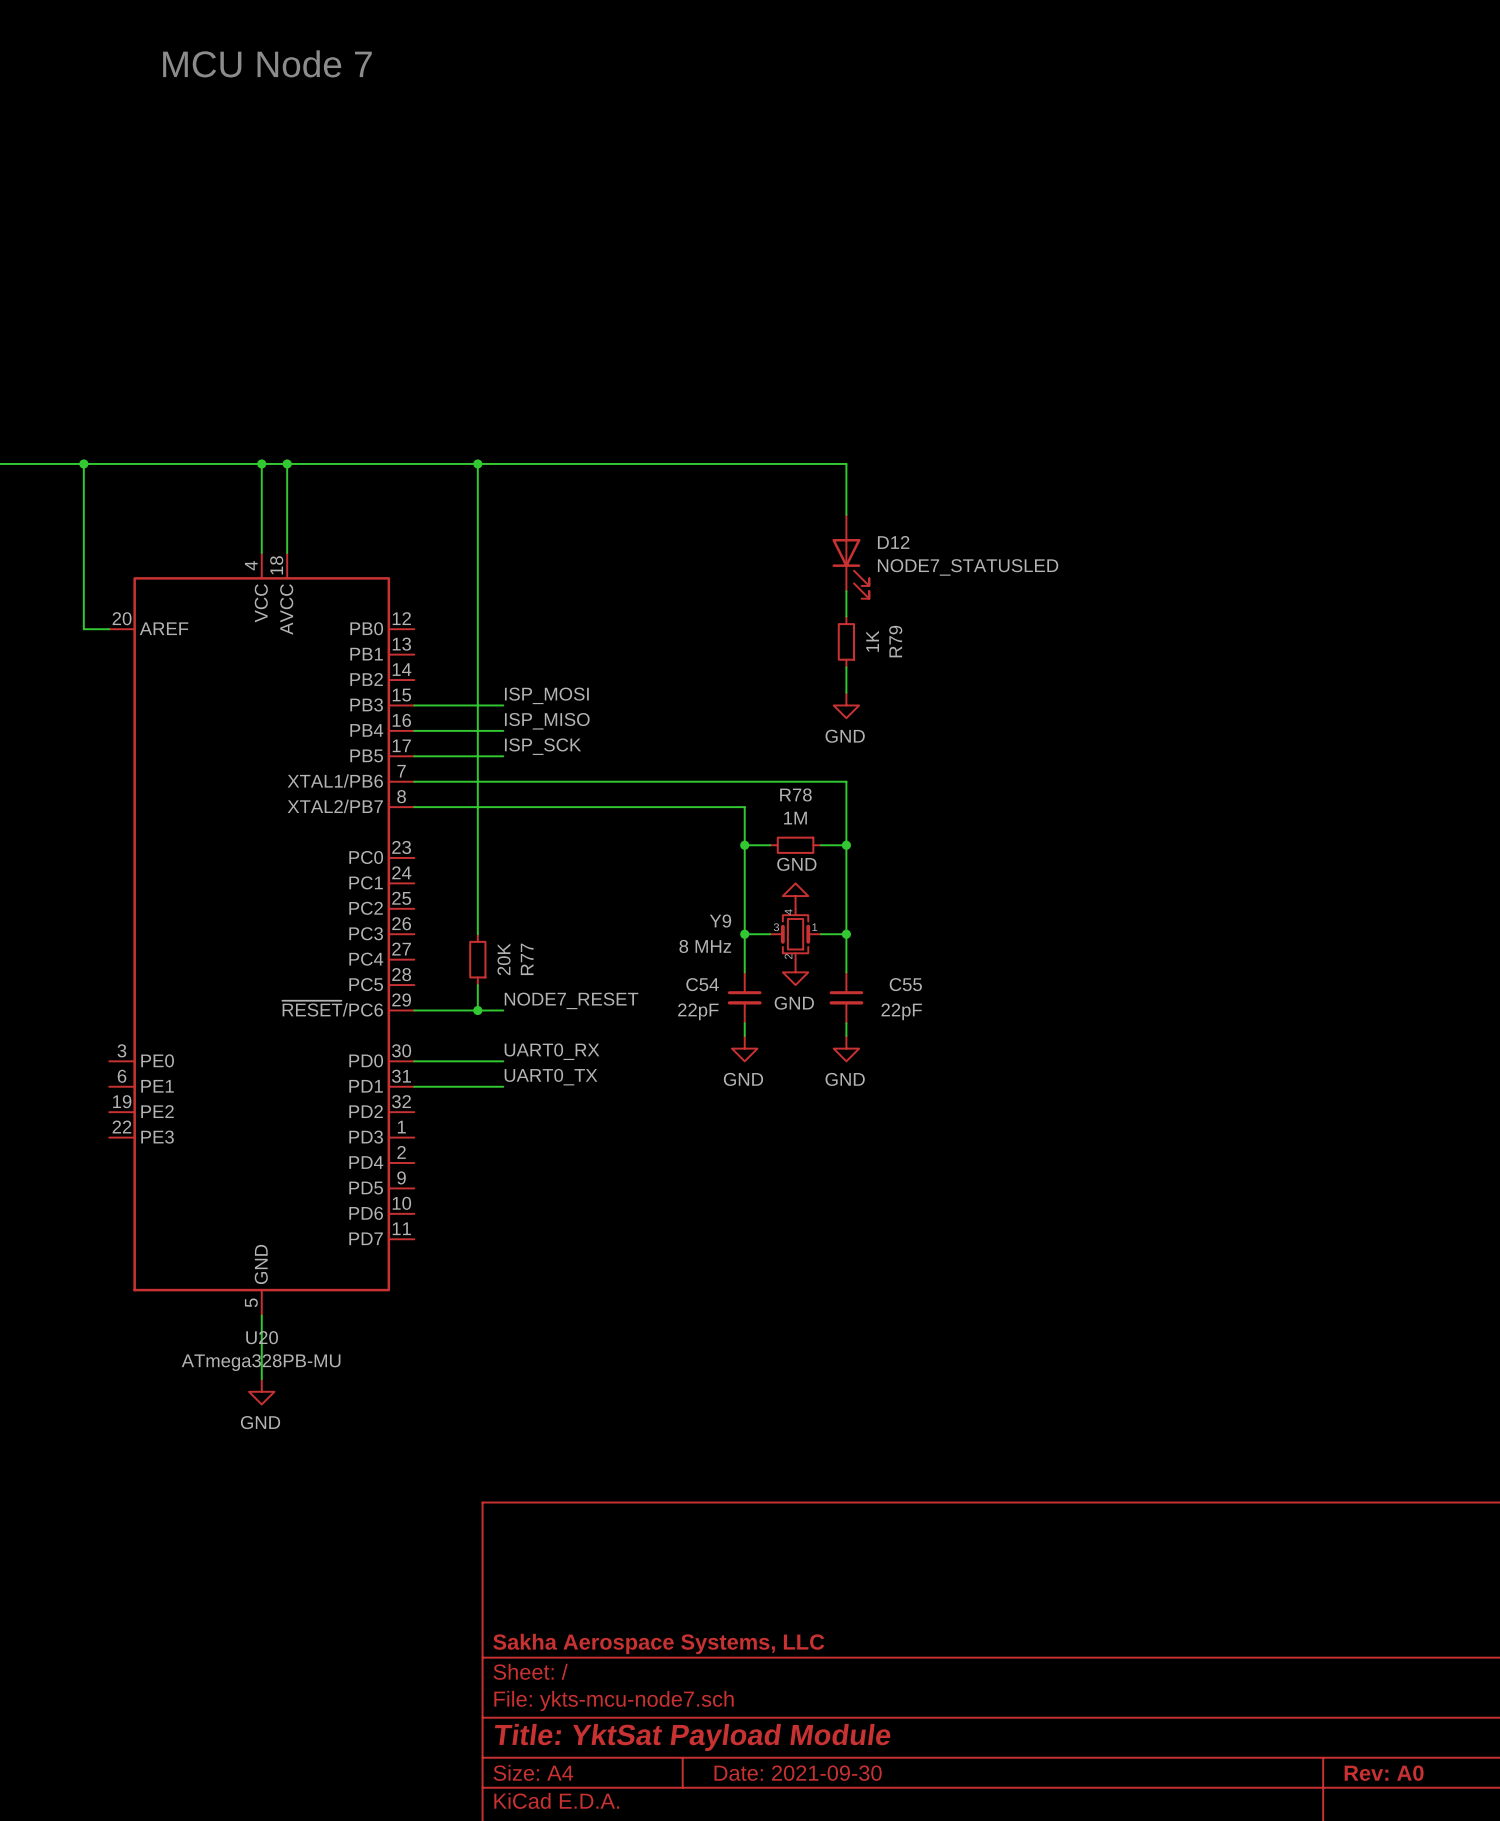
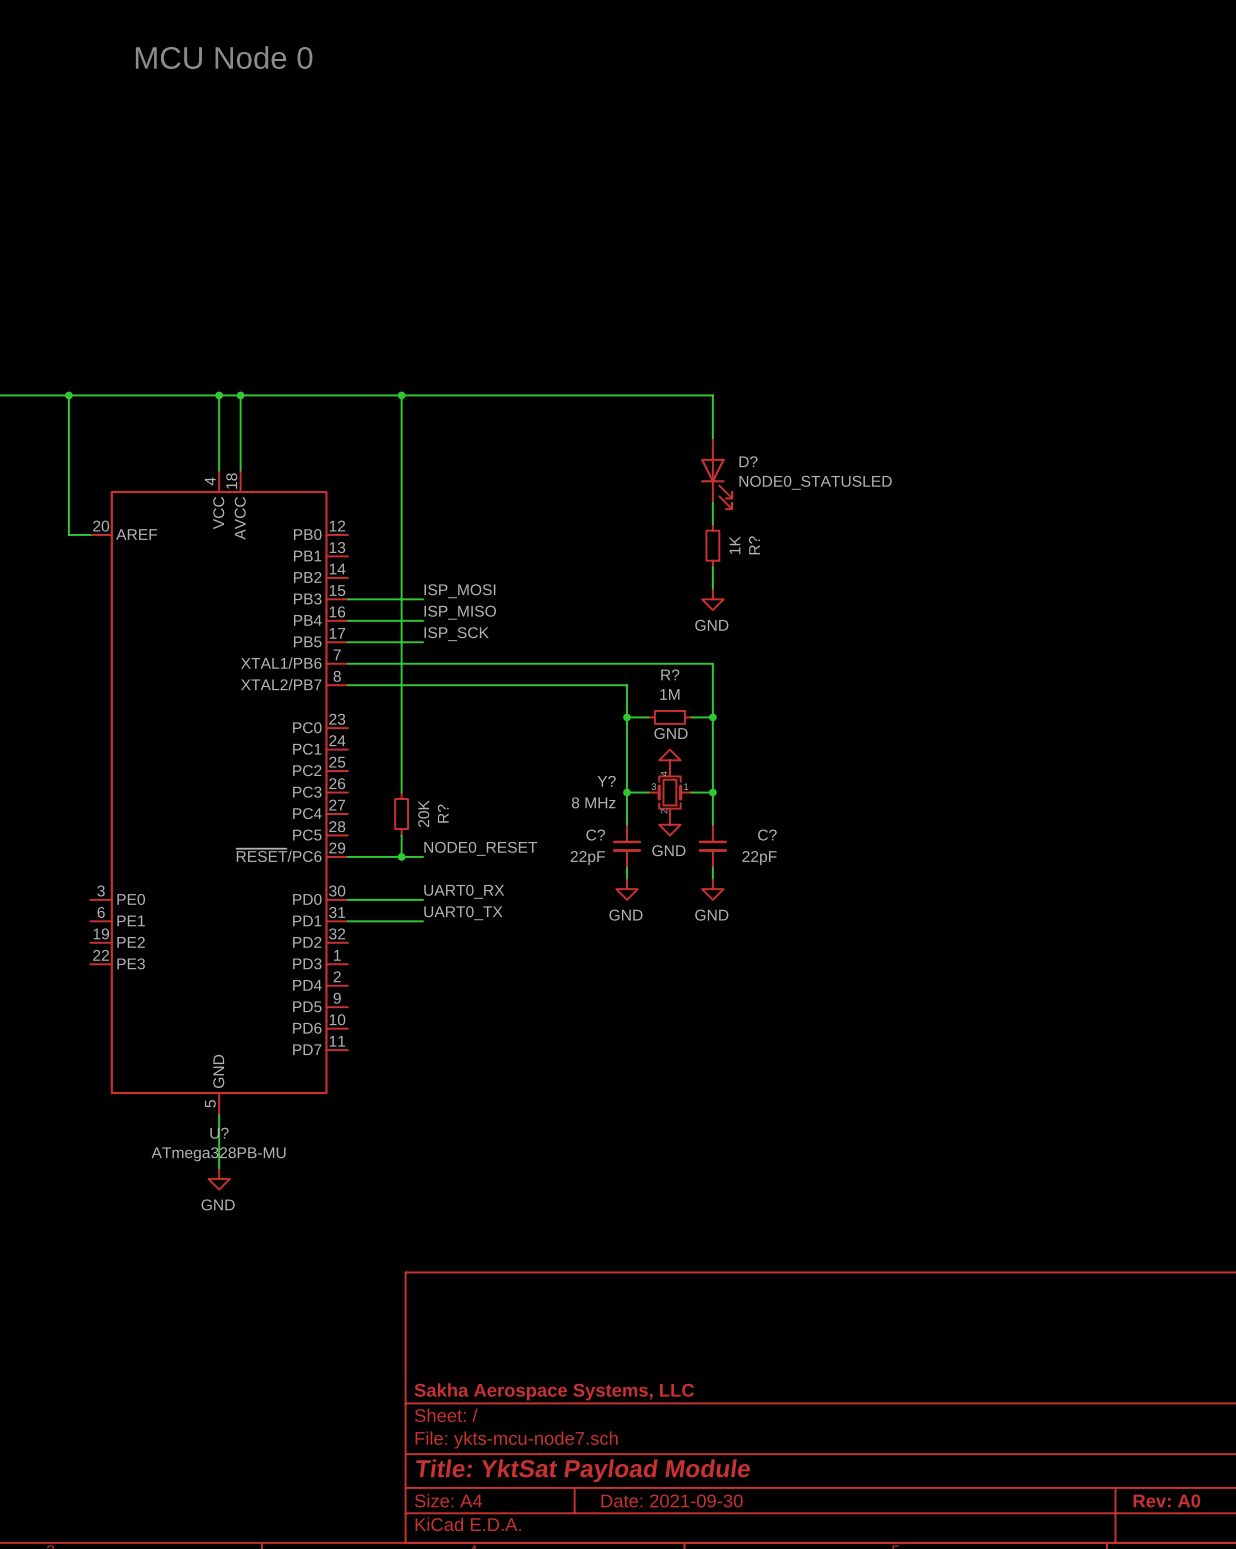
text: MCU Node 7 (267, 63) -> MCU Node 0 (224, 57)
D12 name: D12 (893, 542) -> D? (748, 461)
D12 value: NODE7_STATUSLED (968, 567) -> NODE0_STATUSLED (815, 482)
R79 name: R79 (895, 641) -> R? (754, 545)
R78 name: R78 (795, 794) -> R? (670, 674)
Y9 name: Y9 (720, 921) -> Y? (606, 781)
R77 name: R77 (527, 959) -> R? (443, 813)
C54 name: C54 (702, 984) -> C? (595, 835)
C55 name: C55 (905, 984) -> C? (767, 835)
label: NODE7_RESET (571, 1000) -> NODE0_RESET (480, 848)
U20 name: U20 (262, 1337) -> U? (219, 1133)

